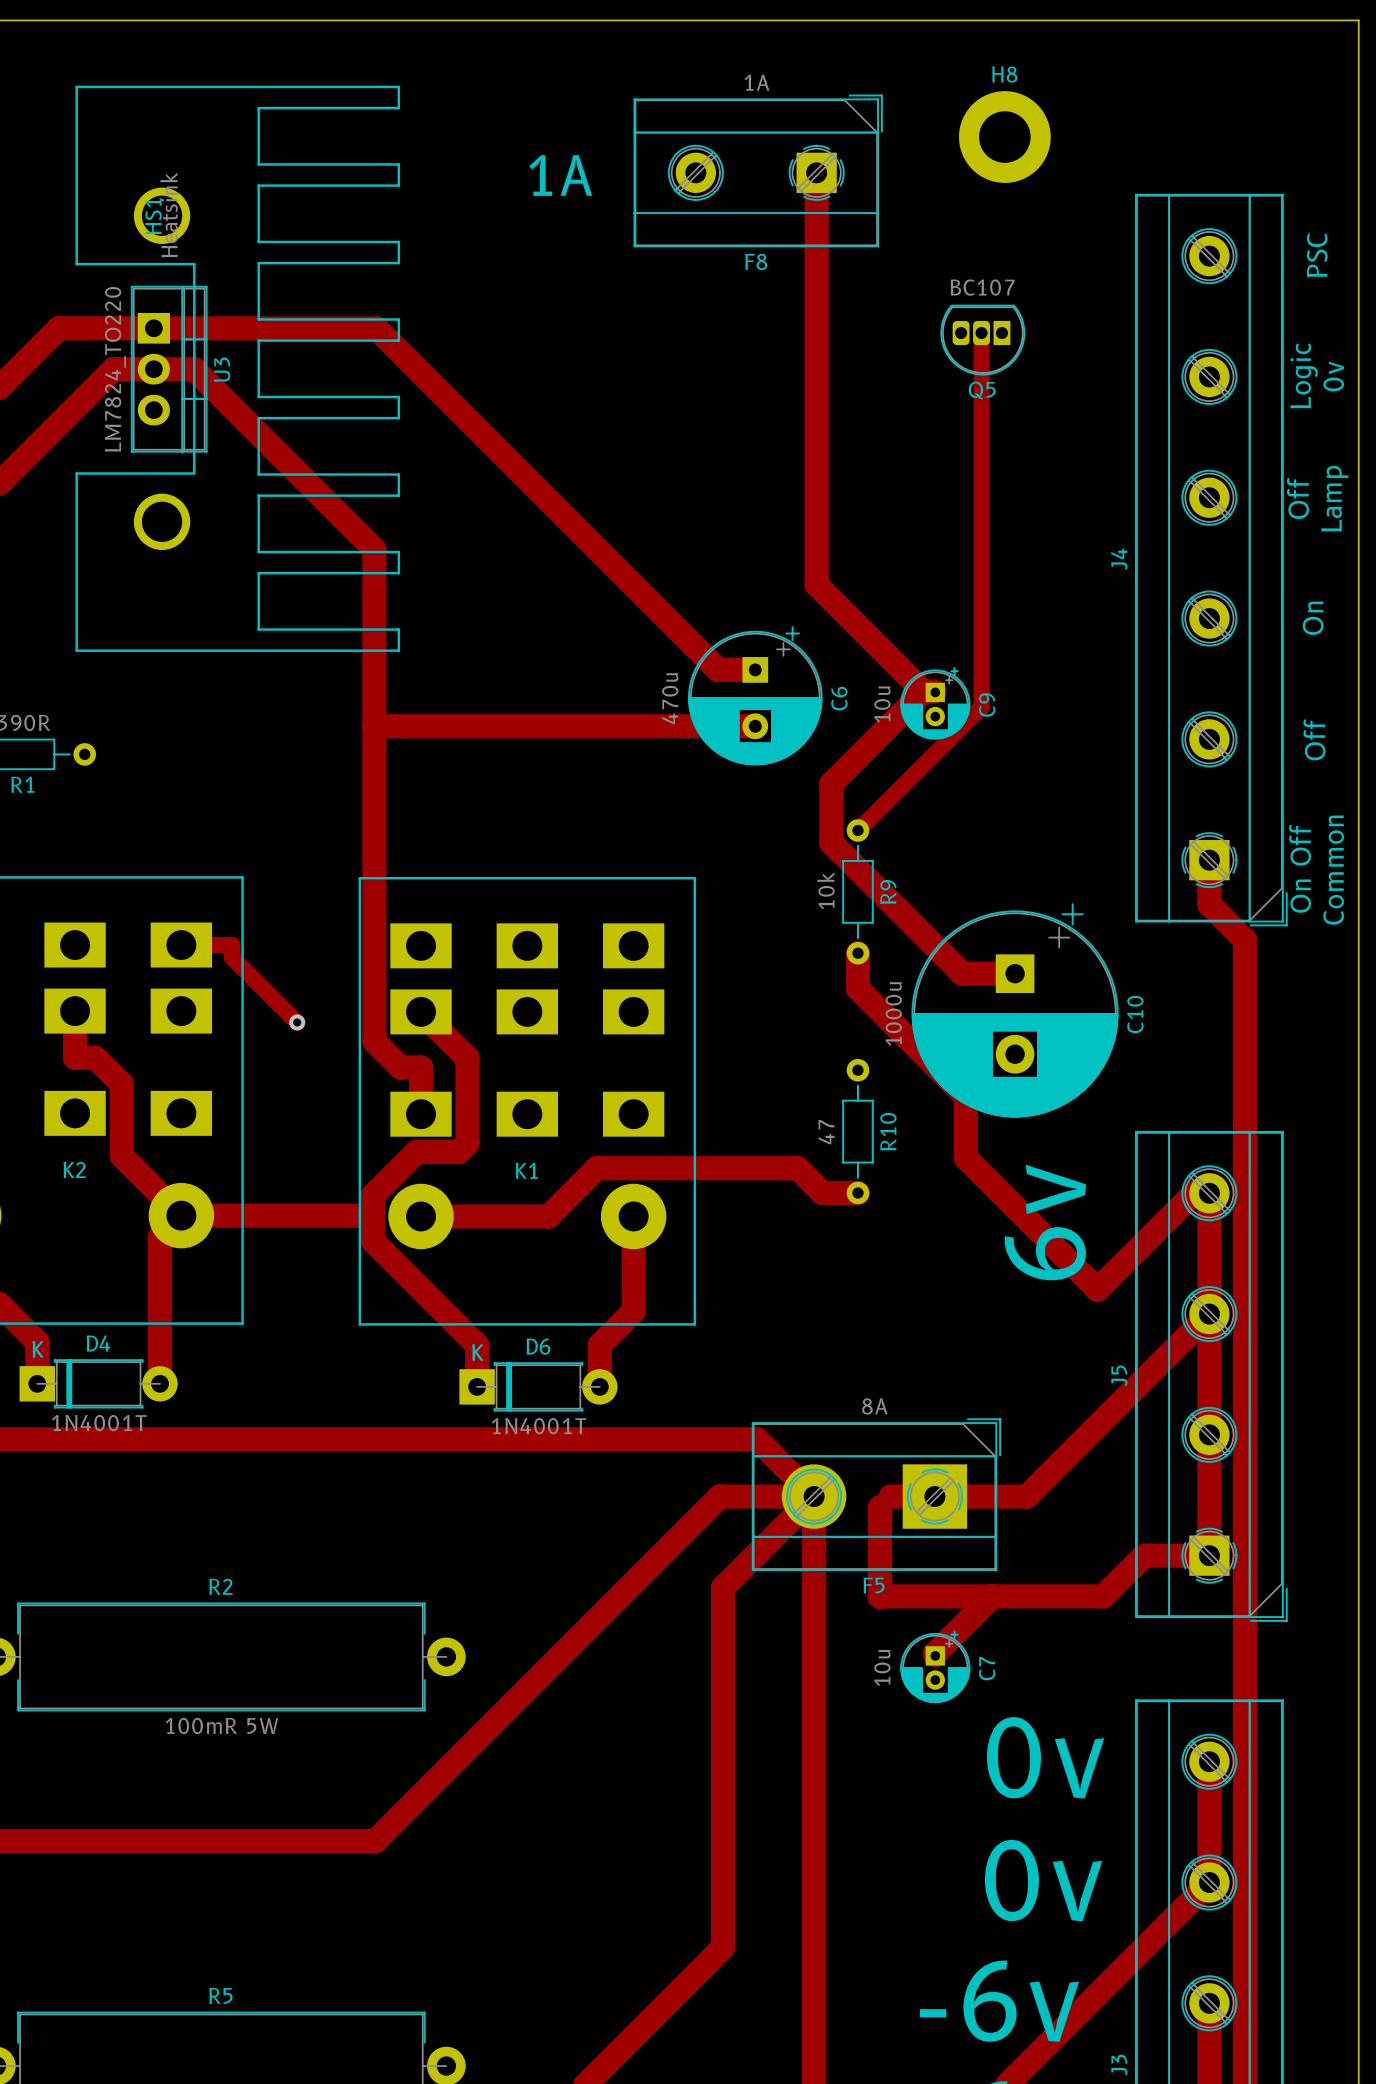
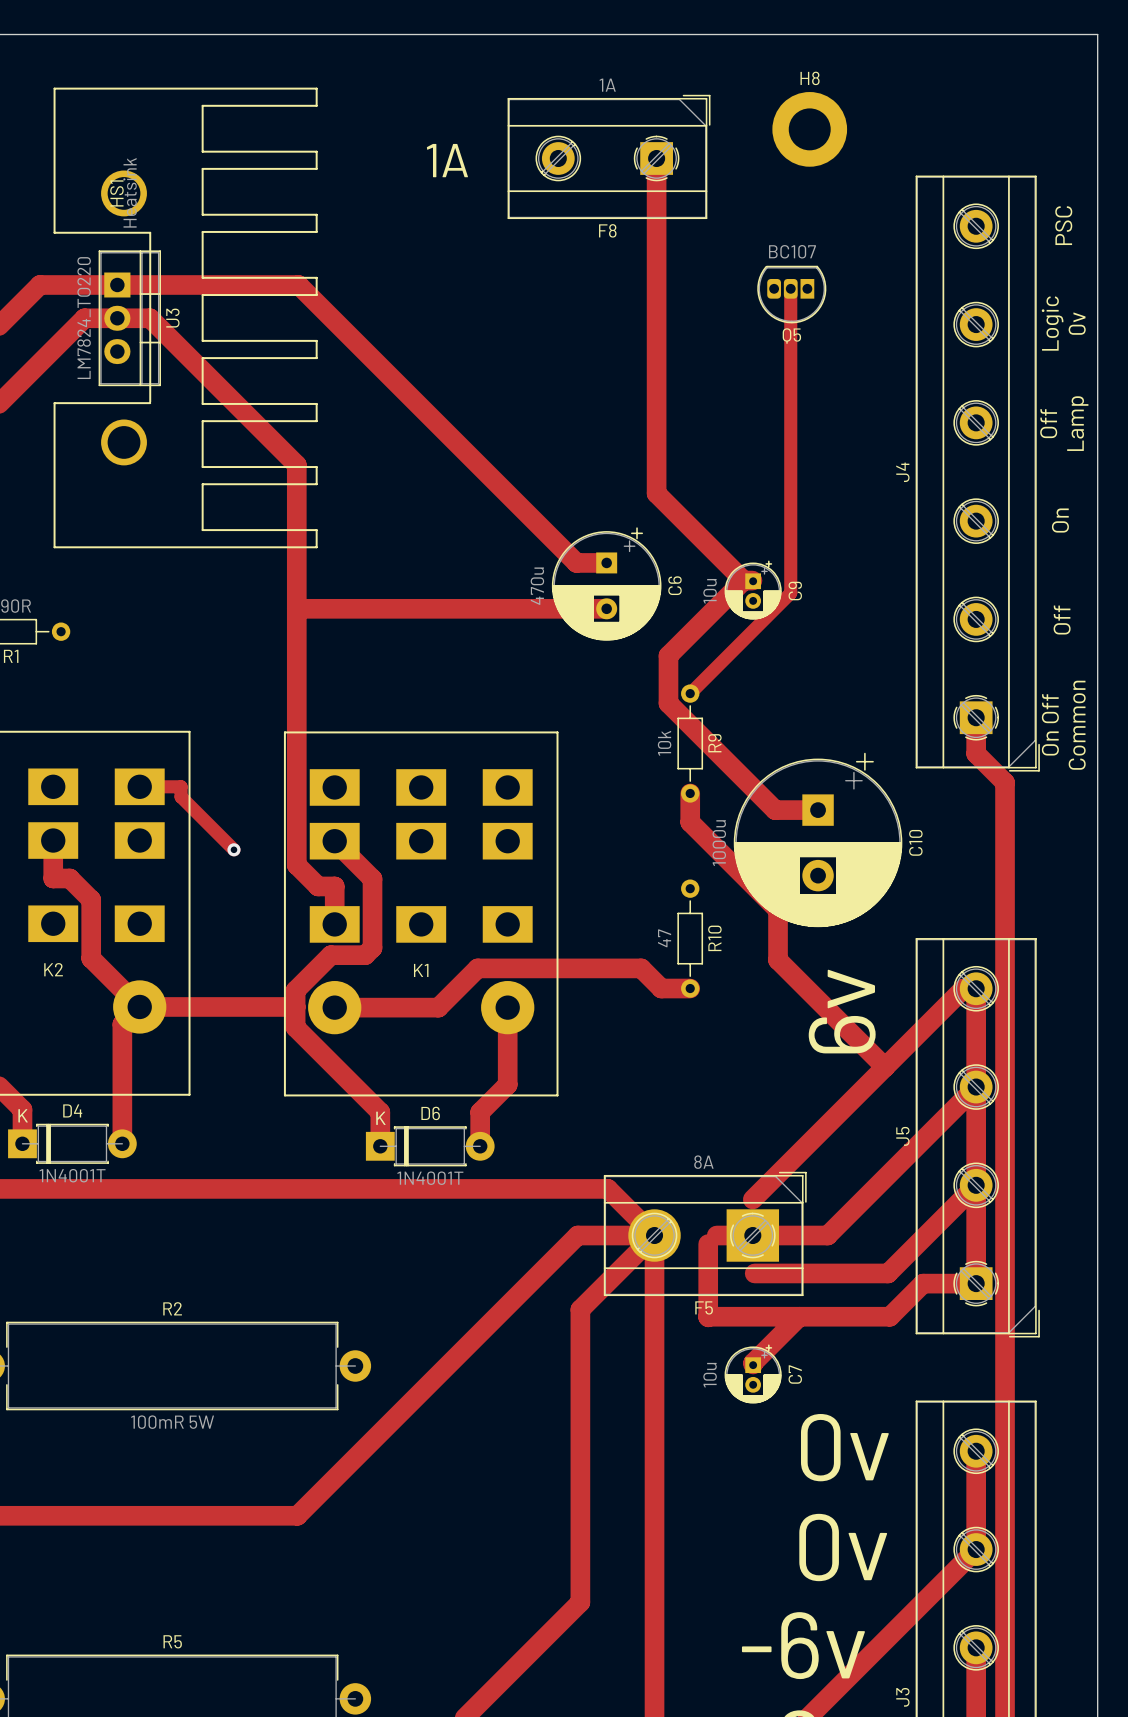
track: none -> (885, 1067) (752, 1199)
track: none -> (976, 1185) (888, 1273) (754, 1273)

